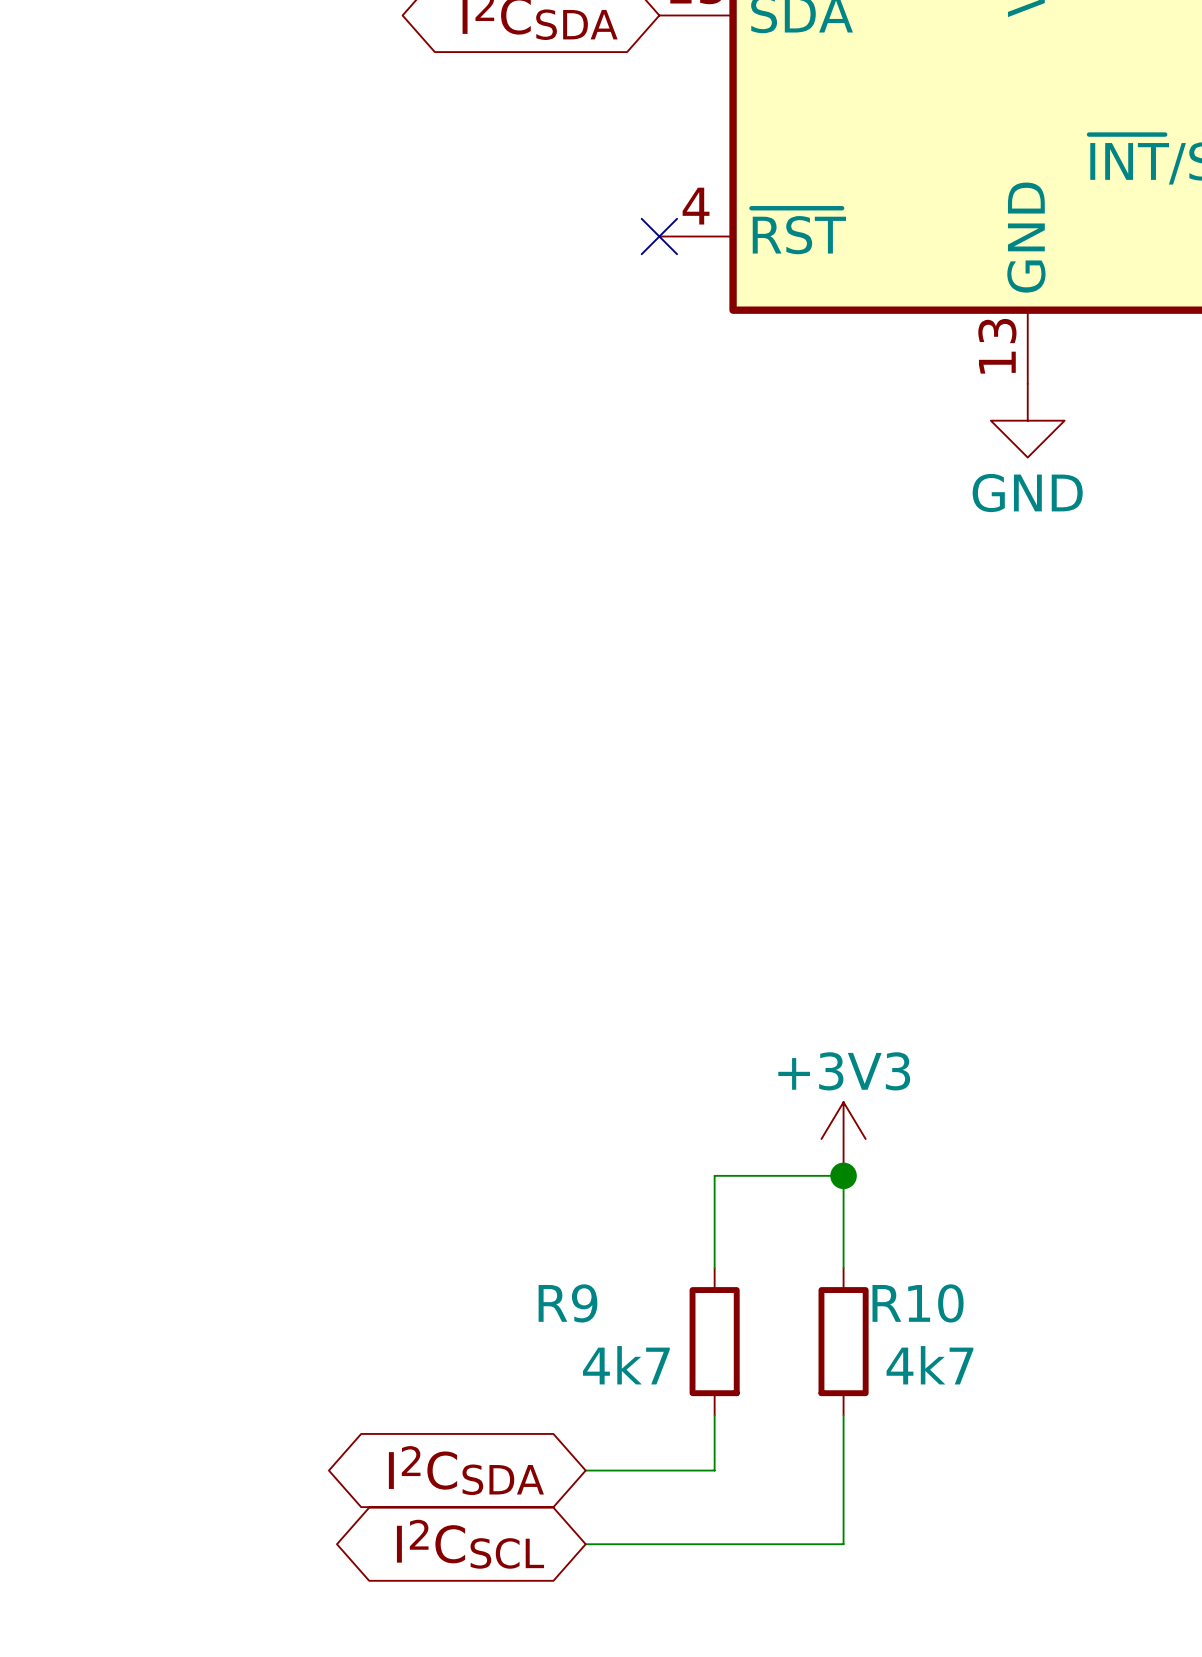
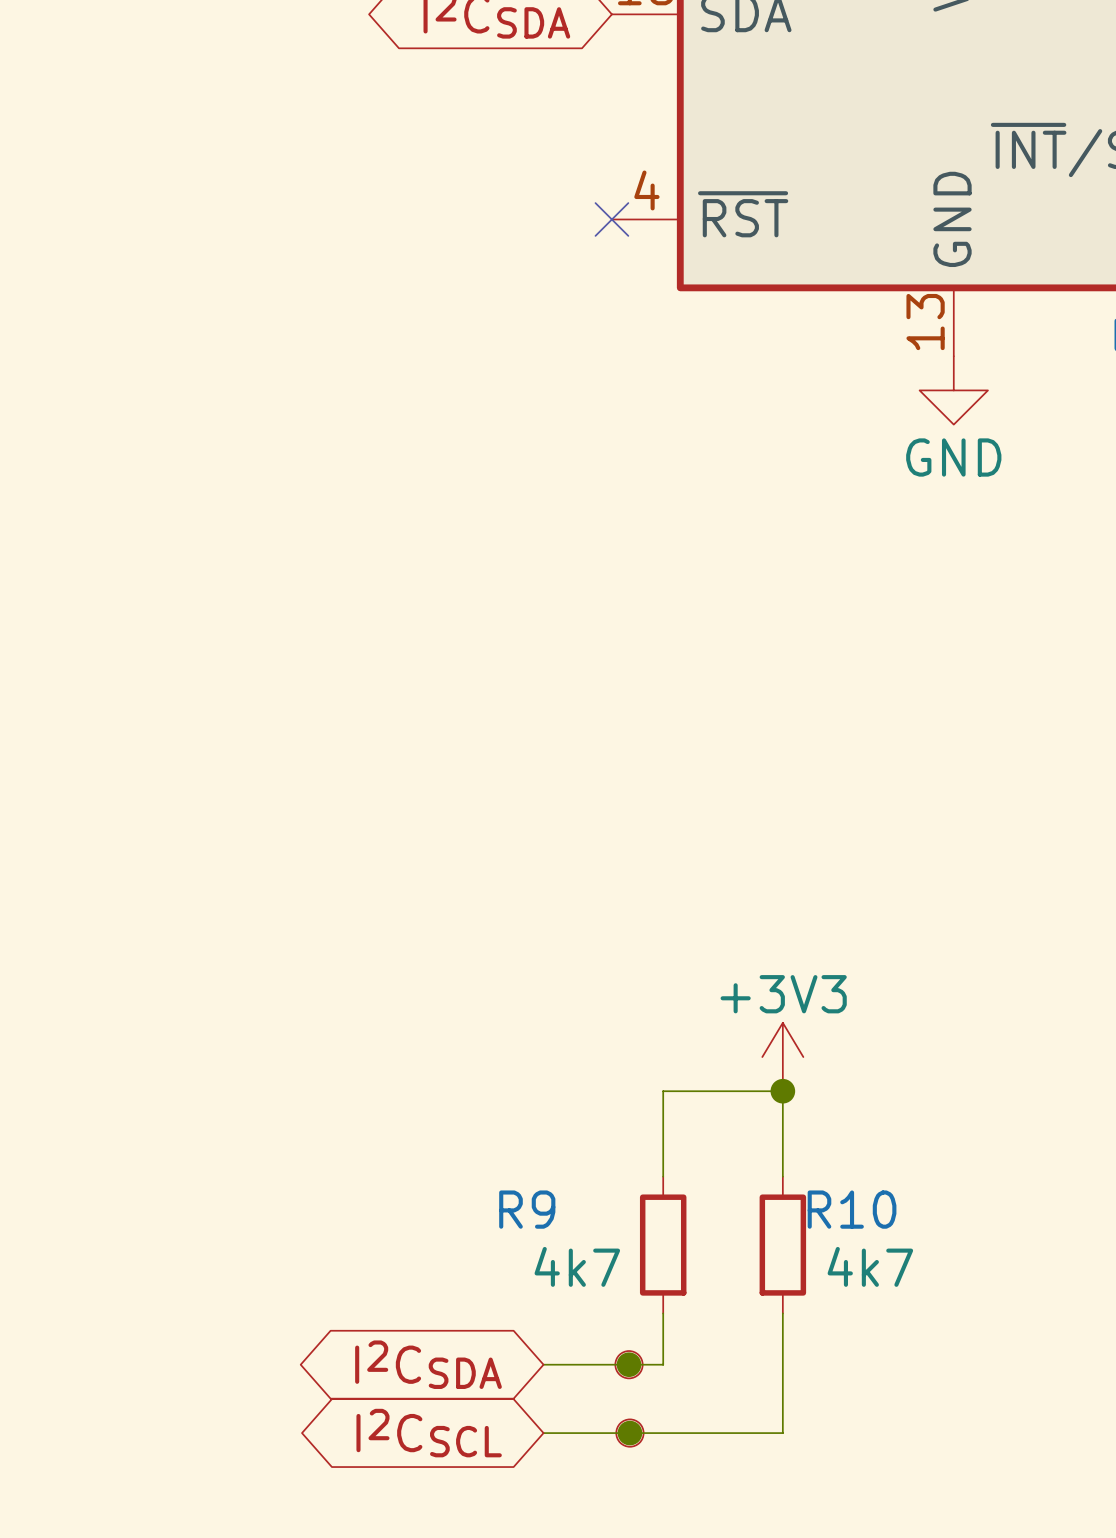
junction: none -> (629, 1364)
part: none -> (629, 1364)
junction: none -> (629, 1433)
part: none -> (629, 1433)

